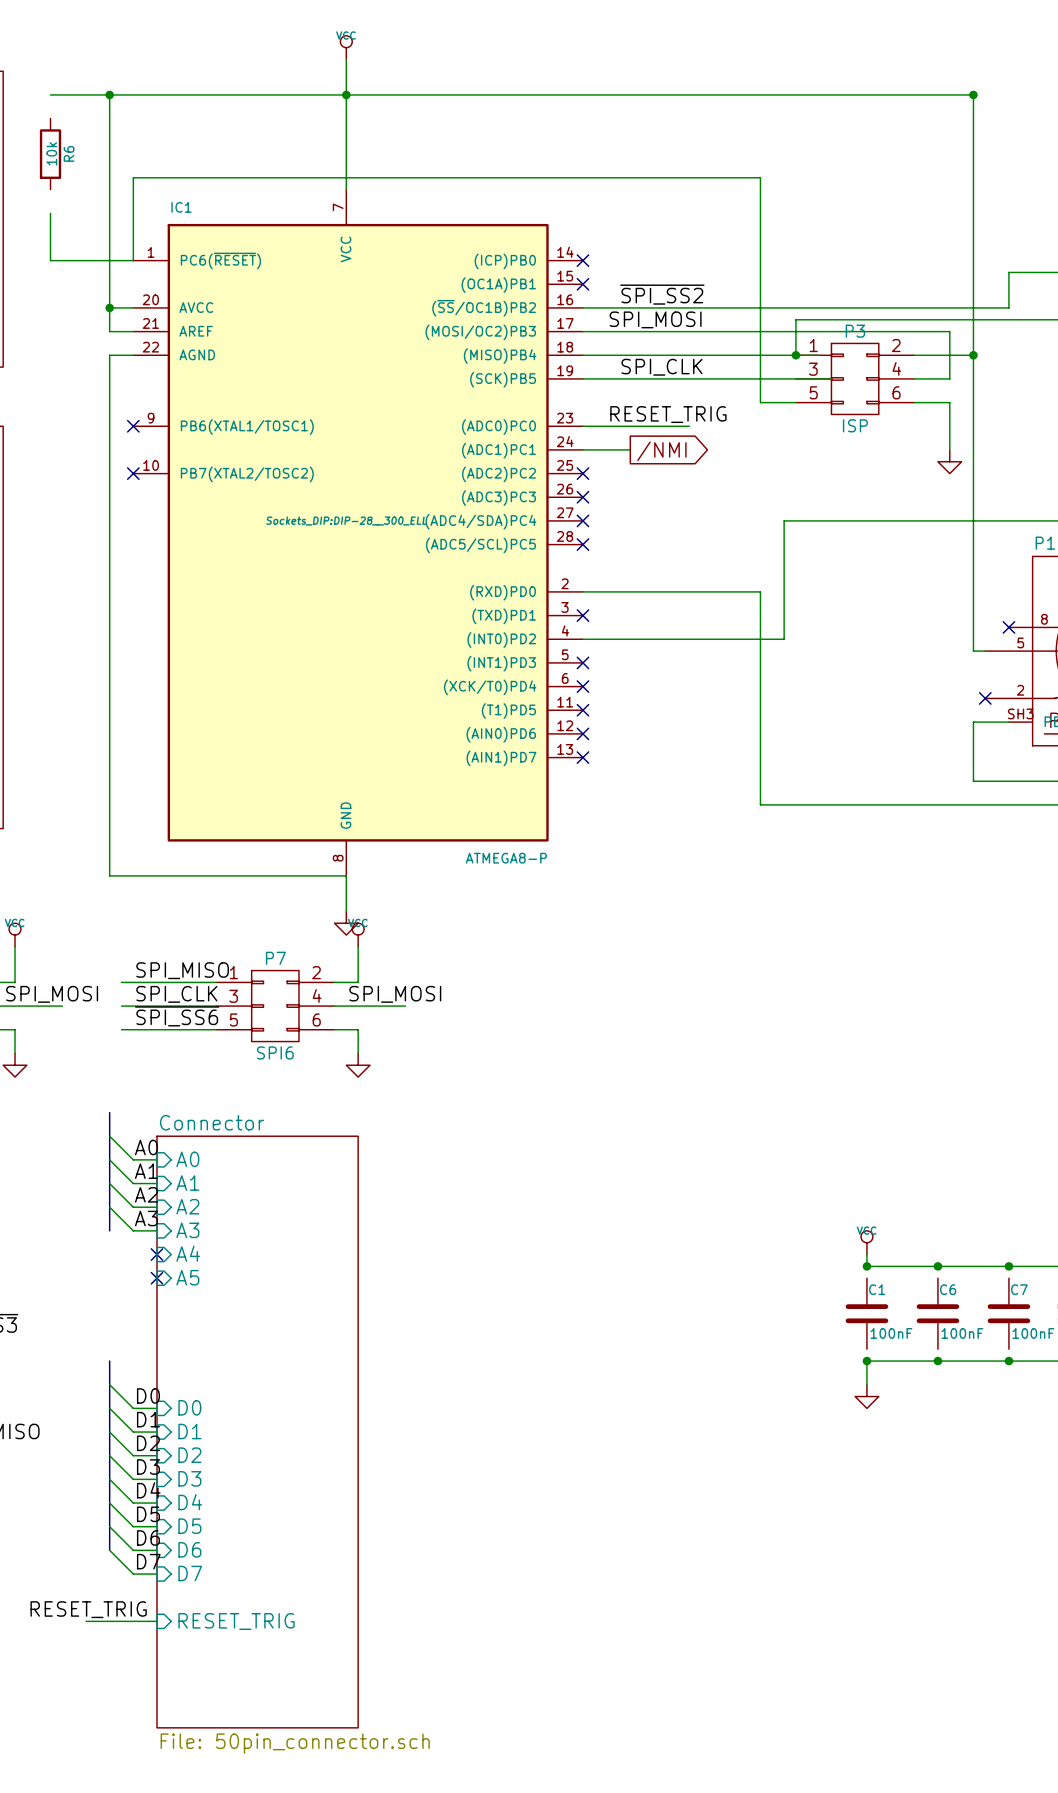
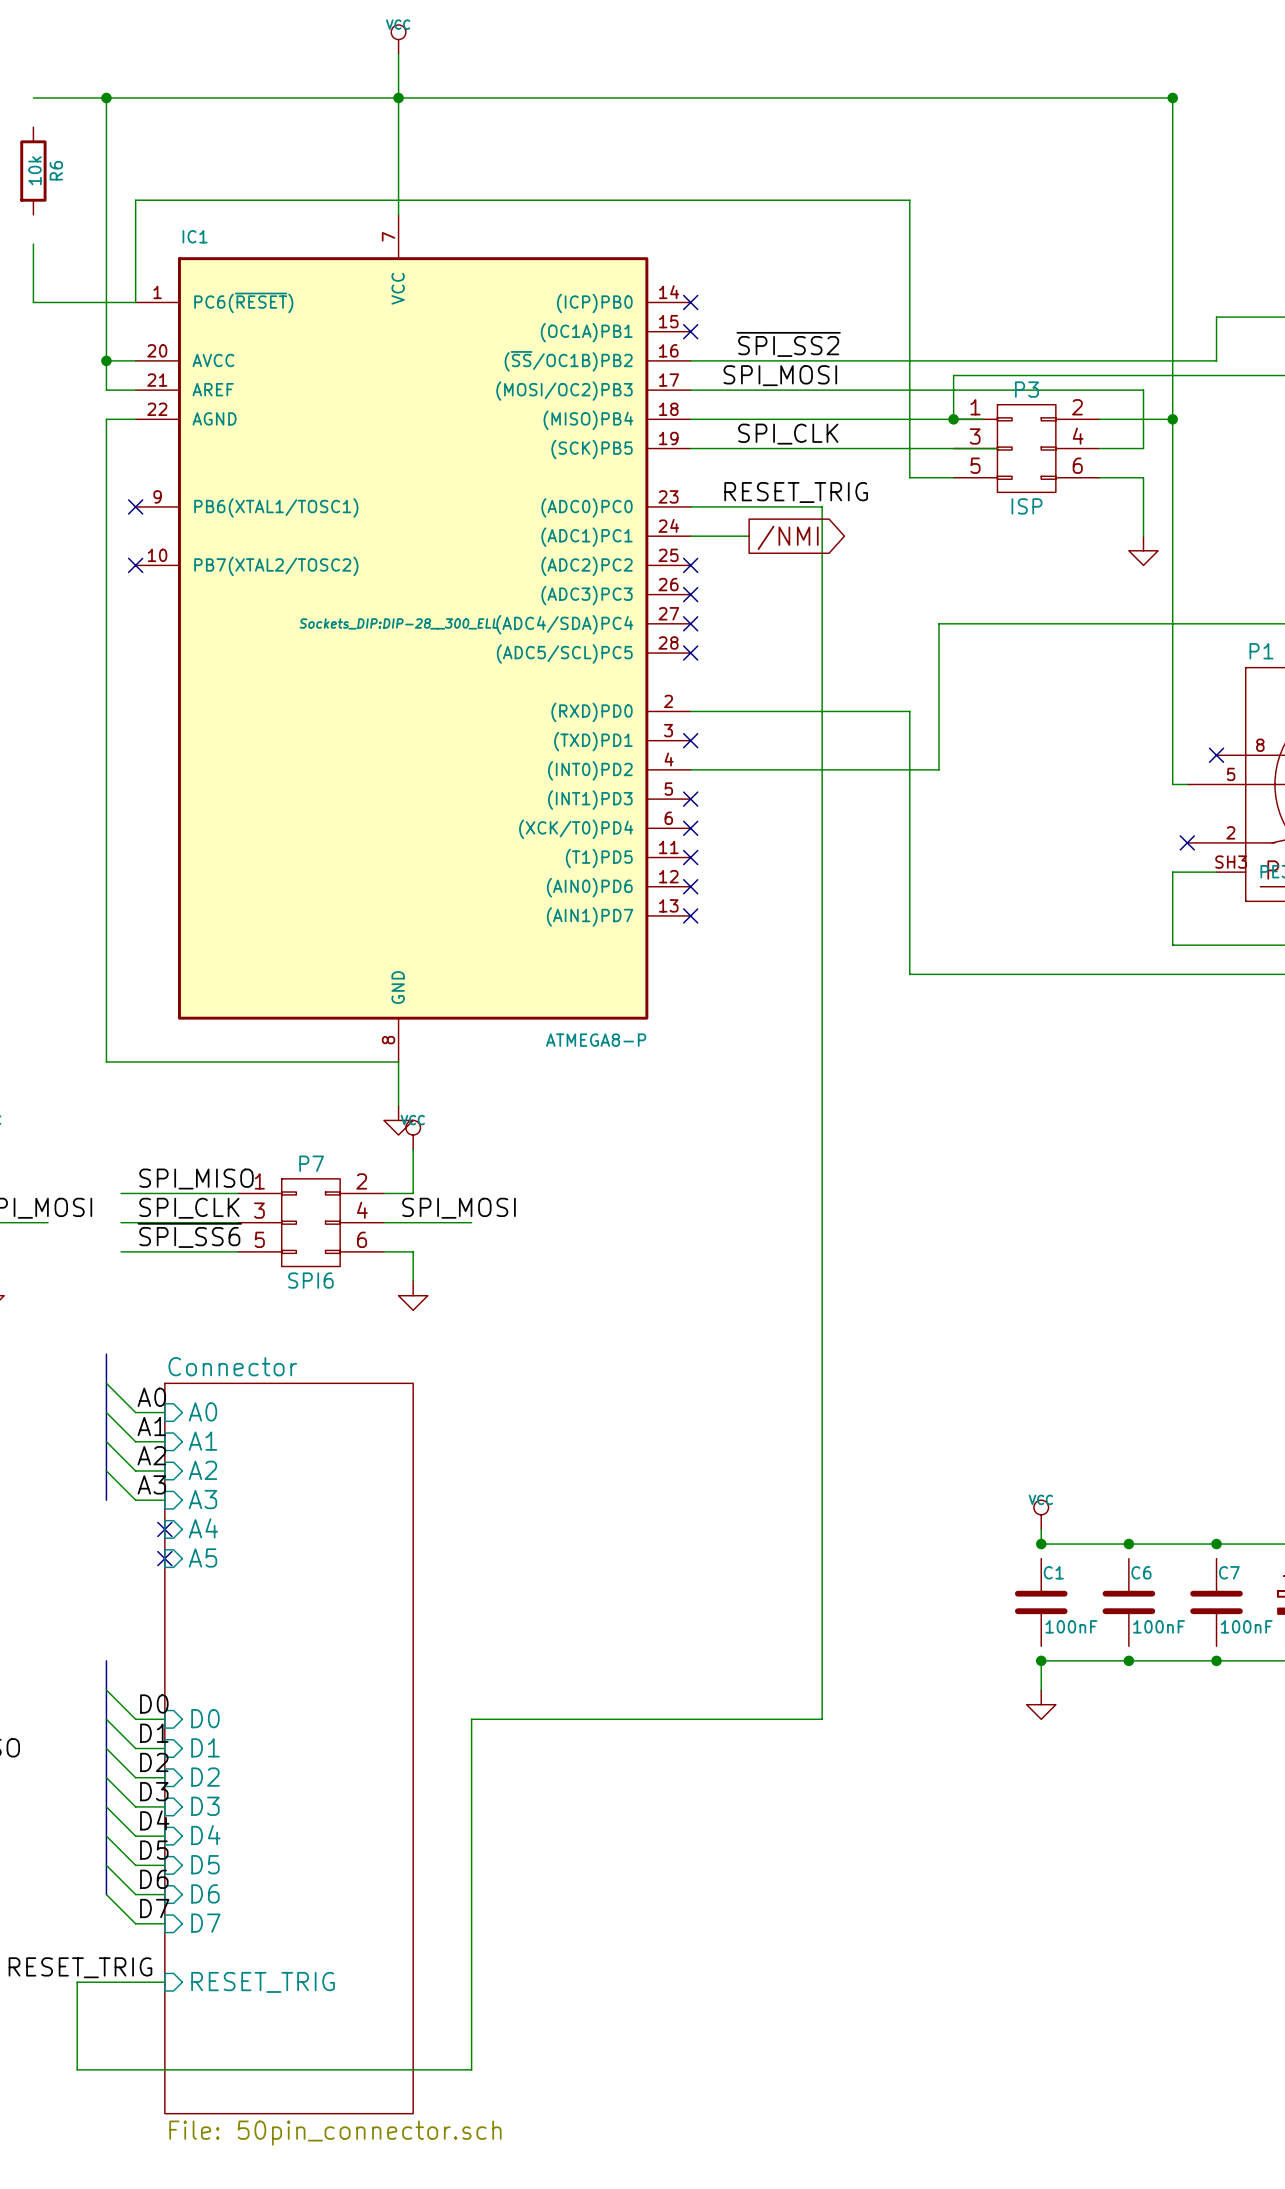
wire: none -> (822, 506) (822, 1719) (471, 1719) (471, 2069) (77, 2069) (77, 1982)

